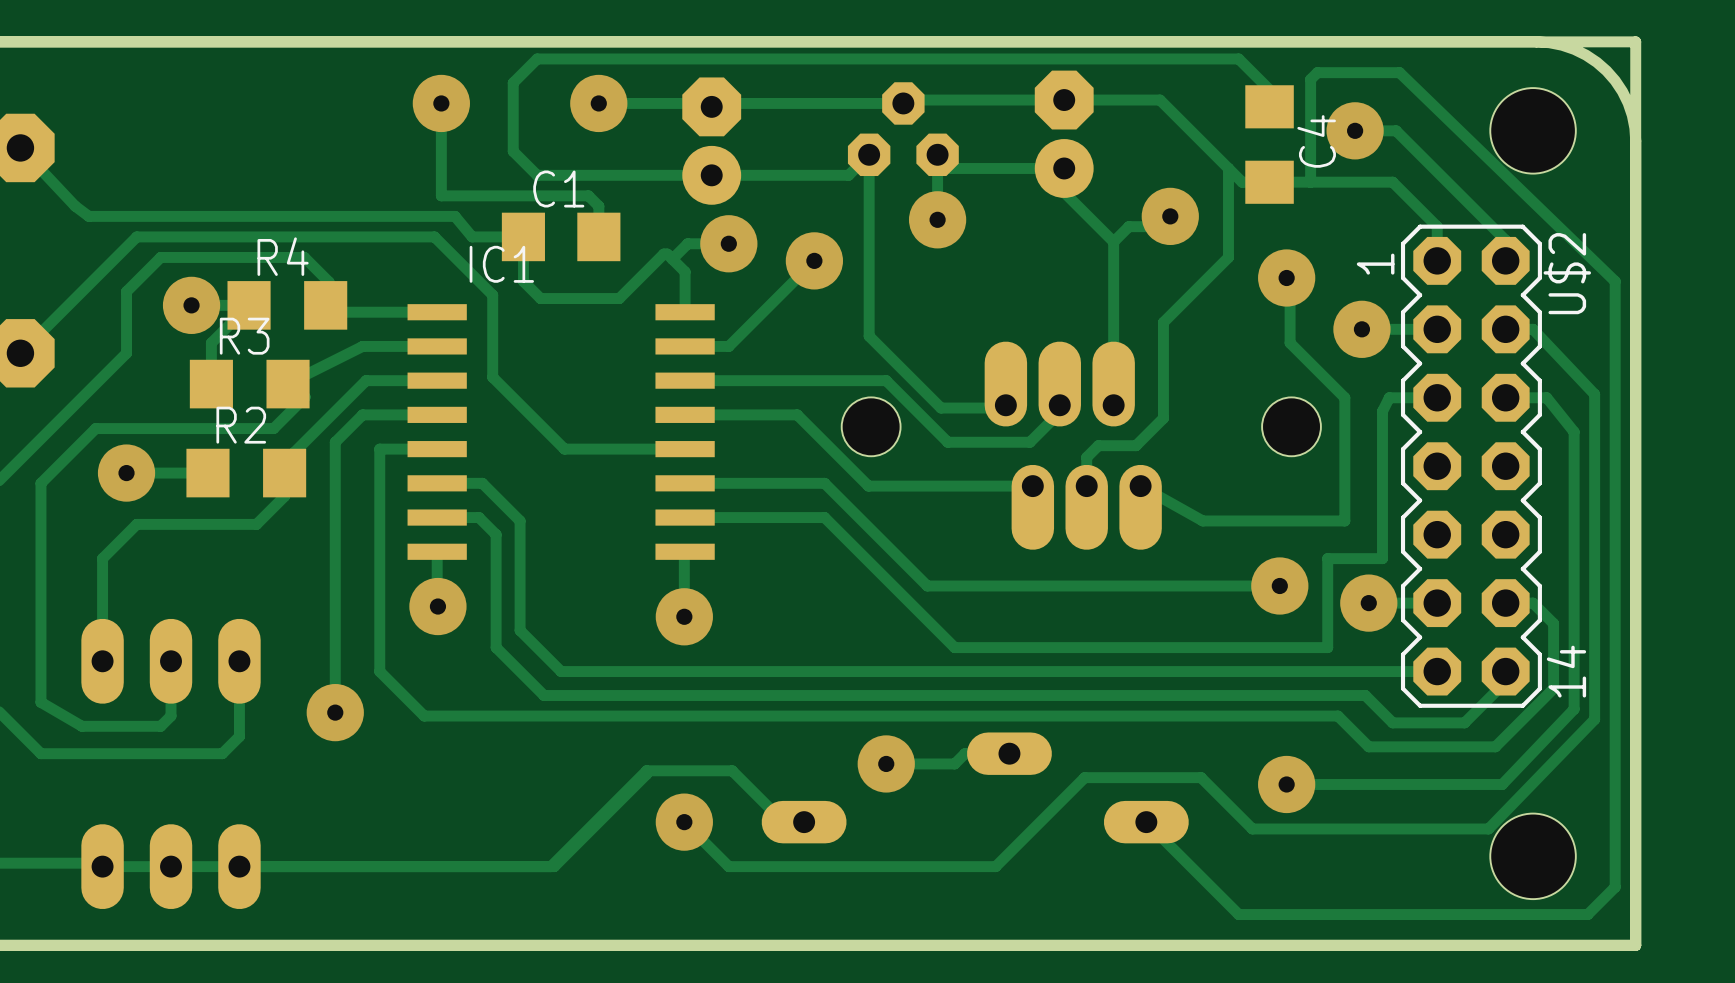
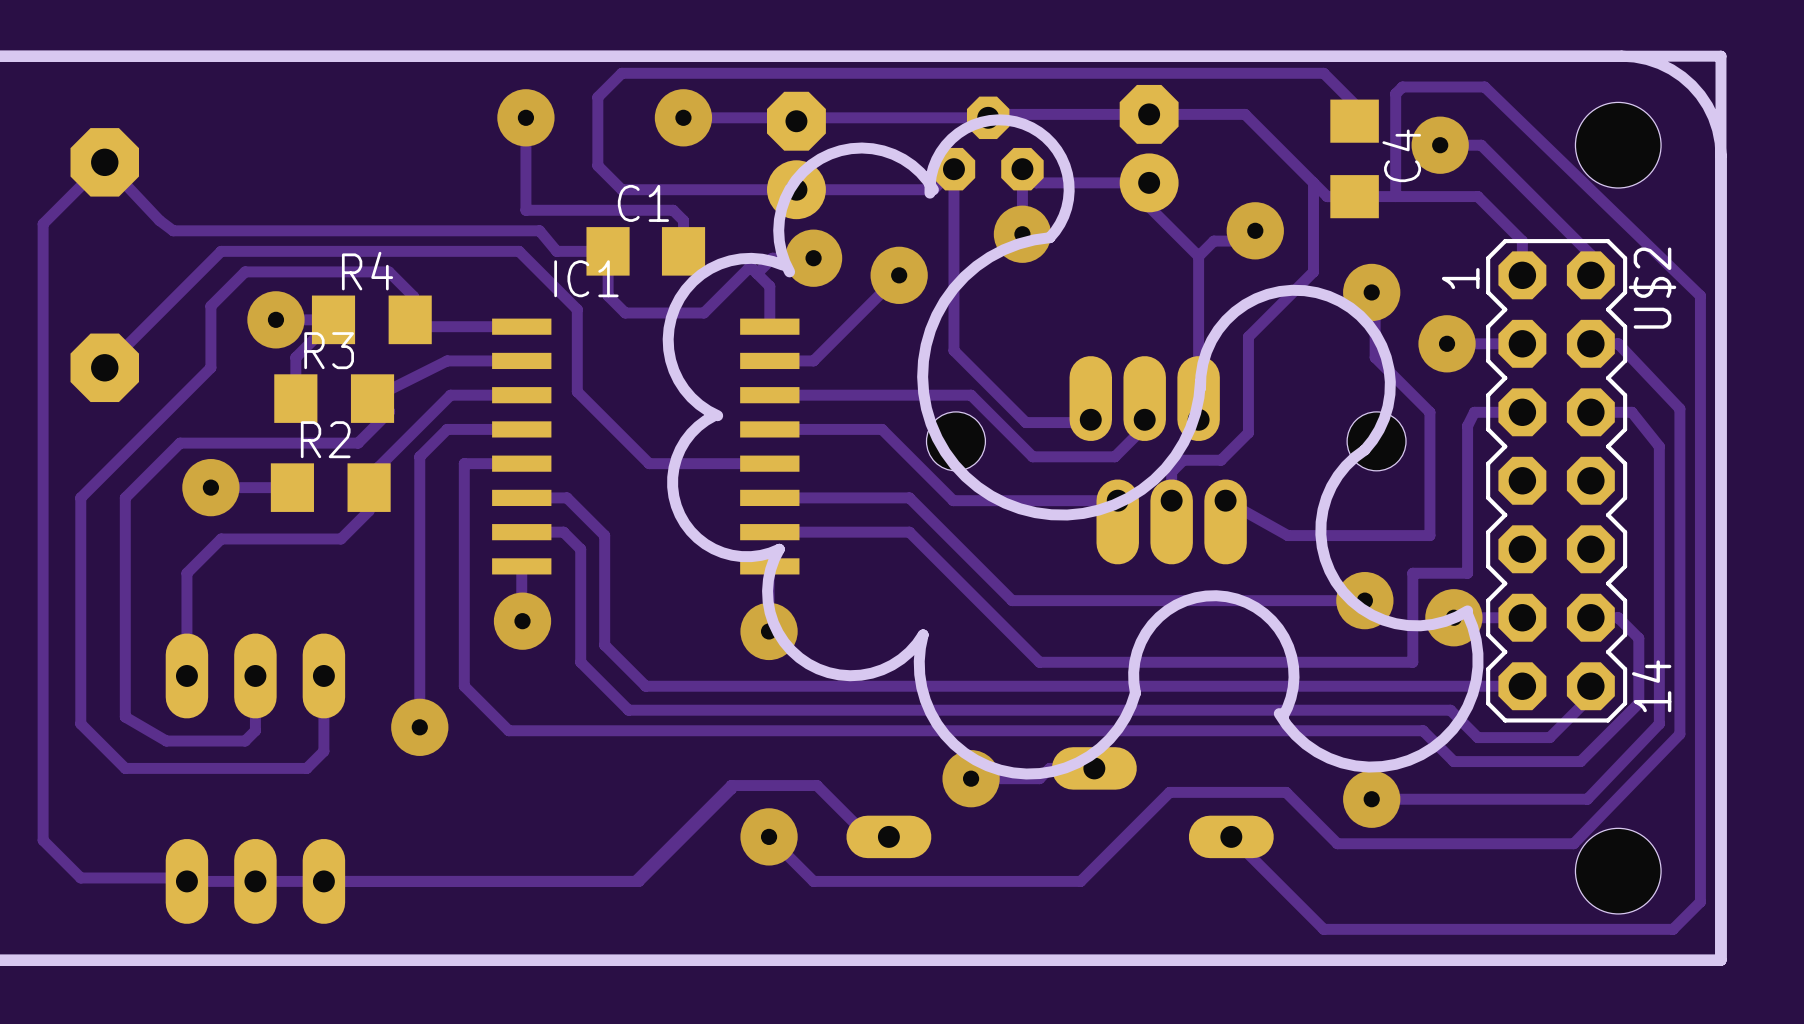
board edge: none -> (933, 189) (912, 165) (883, 150) (851, 148) (820, 158) (796, 180) (781, 209) (779, 241) (789, 271)
board edge: none -> (929, 193) (933, 167) (945, 145) (965, 128) (981, 122) (998, 119) (1023, 124) (1045, 137) (1061, 157) (1068, 182) (1066, 208) (1060, 223) (1049, 237) (1018, 243) (989, 257) (976, 266) (953, 288) (936, 315) (930, 329) (923, 361) (922, 376) (923, 392) (931, 423) (945, 452) (965, 476) (977, 487) (991, 495) (1020, 508) (1051, 514) (1083, 513) (1113, 504) (1128, 498) (1154, 479) (1175, 456) (1190, 428) (1198, 397) (1200, 381)
board edge: none -> (782, 265) (751, 258) (719, 264) (693, 281) (674, 307) (668, 339) (673, 370) (691, 397) (717, 415)
board edge: none -> (1200, 388) (1200, 375) (1206, 351) (1218, 329) (1235, 311) (1256, 298) (1279, 291) (1304, 290) (1316, 292) (1340, 301) (1360, 315) (1375, 334) (1381, 345) (1389, 369) (1389, 394) (1384, 418) (1379, 429) (1364, 449) (1354, 457) (1337, 475) (1326, 497) (1321, 522) (1320, 534) (1325, 559) (1335, 581) (1343, 591) (1361, 608) (1383, 620) (1407, 625) (1420, 625) (1445, 621) (1467, 610)
board edge: none -> (714, 415) (691, 433) (676, 458) (672, 477) (673, 496) (684, 523) (697, 538) (722, 552) (751, 556) (779, 549) (768, 580) (770, 612) (784, 642) (799, 657) (818, 668) (839, 674) (871, 673) (901, 659) (923, 634) (920, 647) (919, 674) (925, 700) (930, 712) (945, 734) (954, 744) (975, 760) (1000, 770) (1013, 772) (1039, 773) (1065, 767) (1089, 756) (1109, 739) (1125, 717) (1131, 705) (1135, 693) (1133, 672) (1137, 651) (1152, 624) (1176, 605) (1205, 596) (1226, 596) (1246, 602) (1264, 613) (1278, 628) (1291, 656) (1294, 677) (1290, 697) (1282, 717)
board edge: none -> (1467, 614) (1476, 640) (1477, 653) (1476, 680) (1472, 693) (1467, 706) (1452, 729) (1443, 739) (1421, 754) (1408, 760) (1382, 766) (1368, 767) (1341, 762) (1317, 752) (1305, 744) (1286, 724) (1279, 713)

